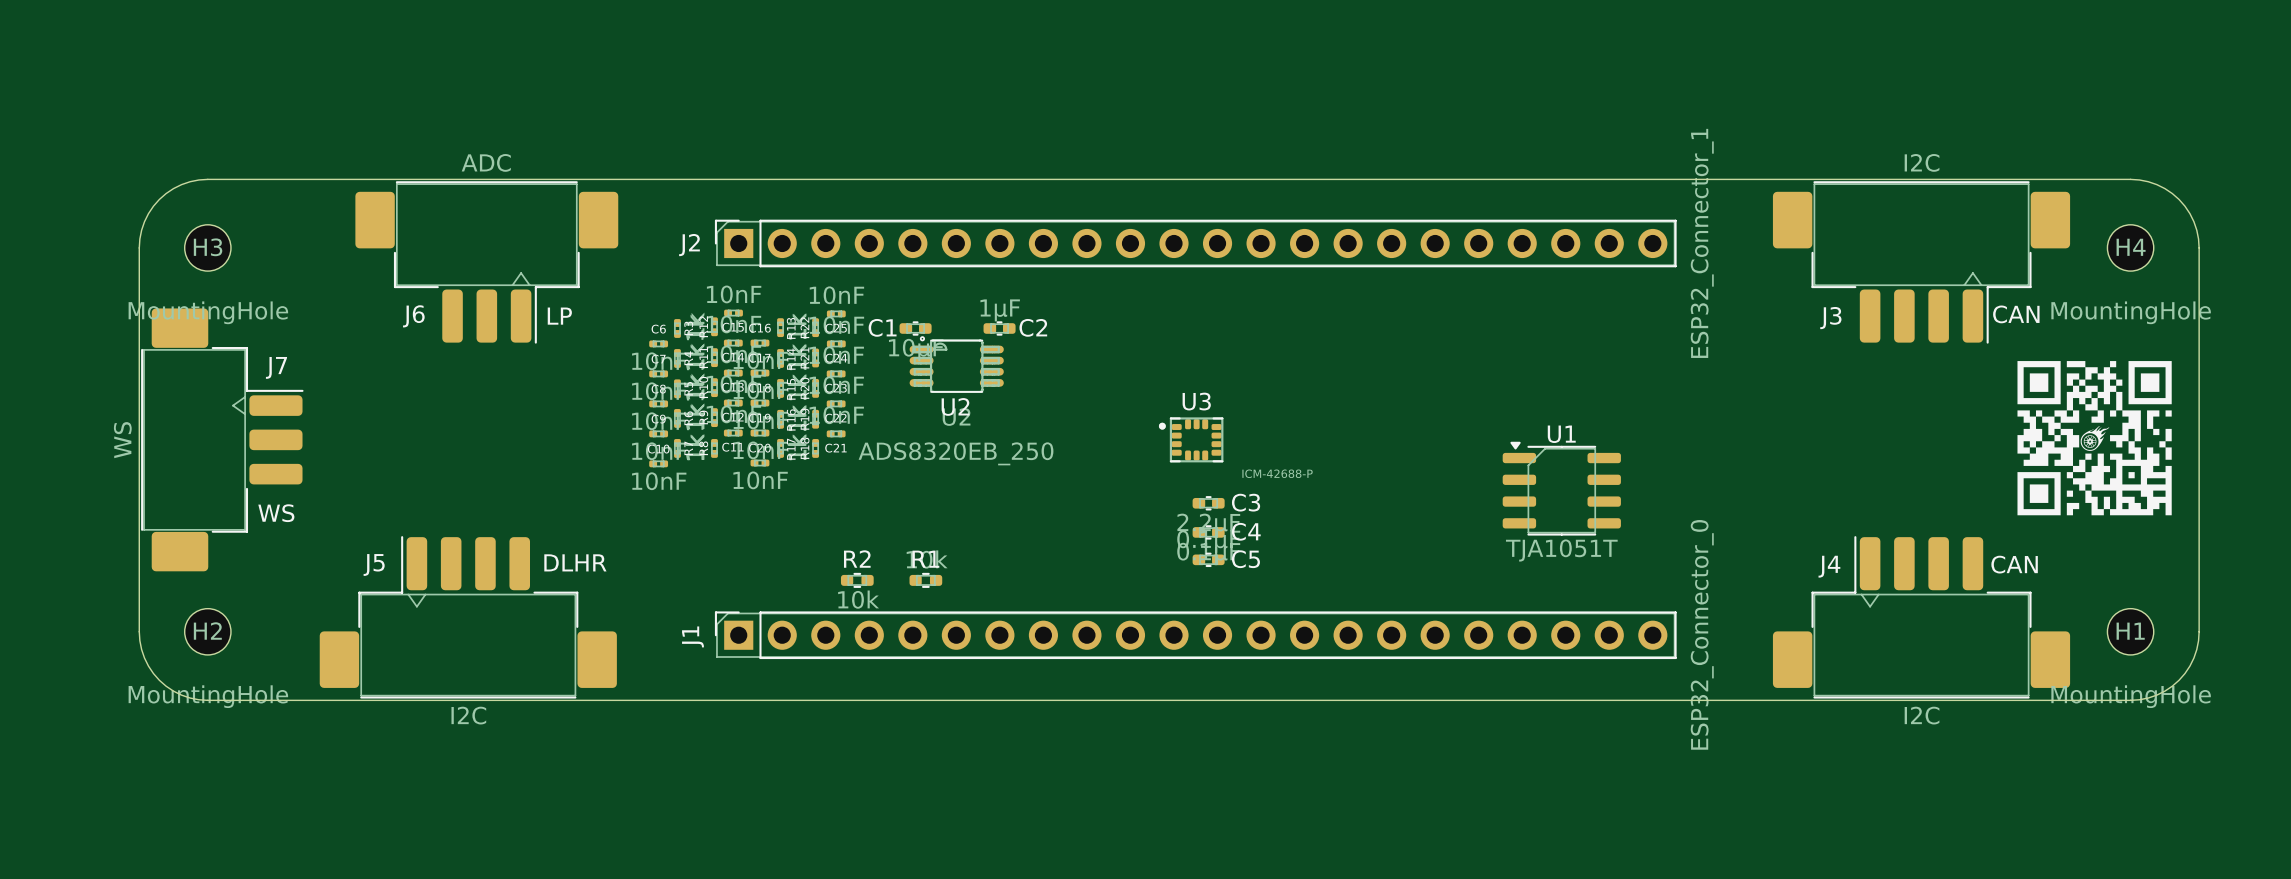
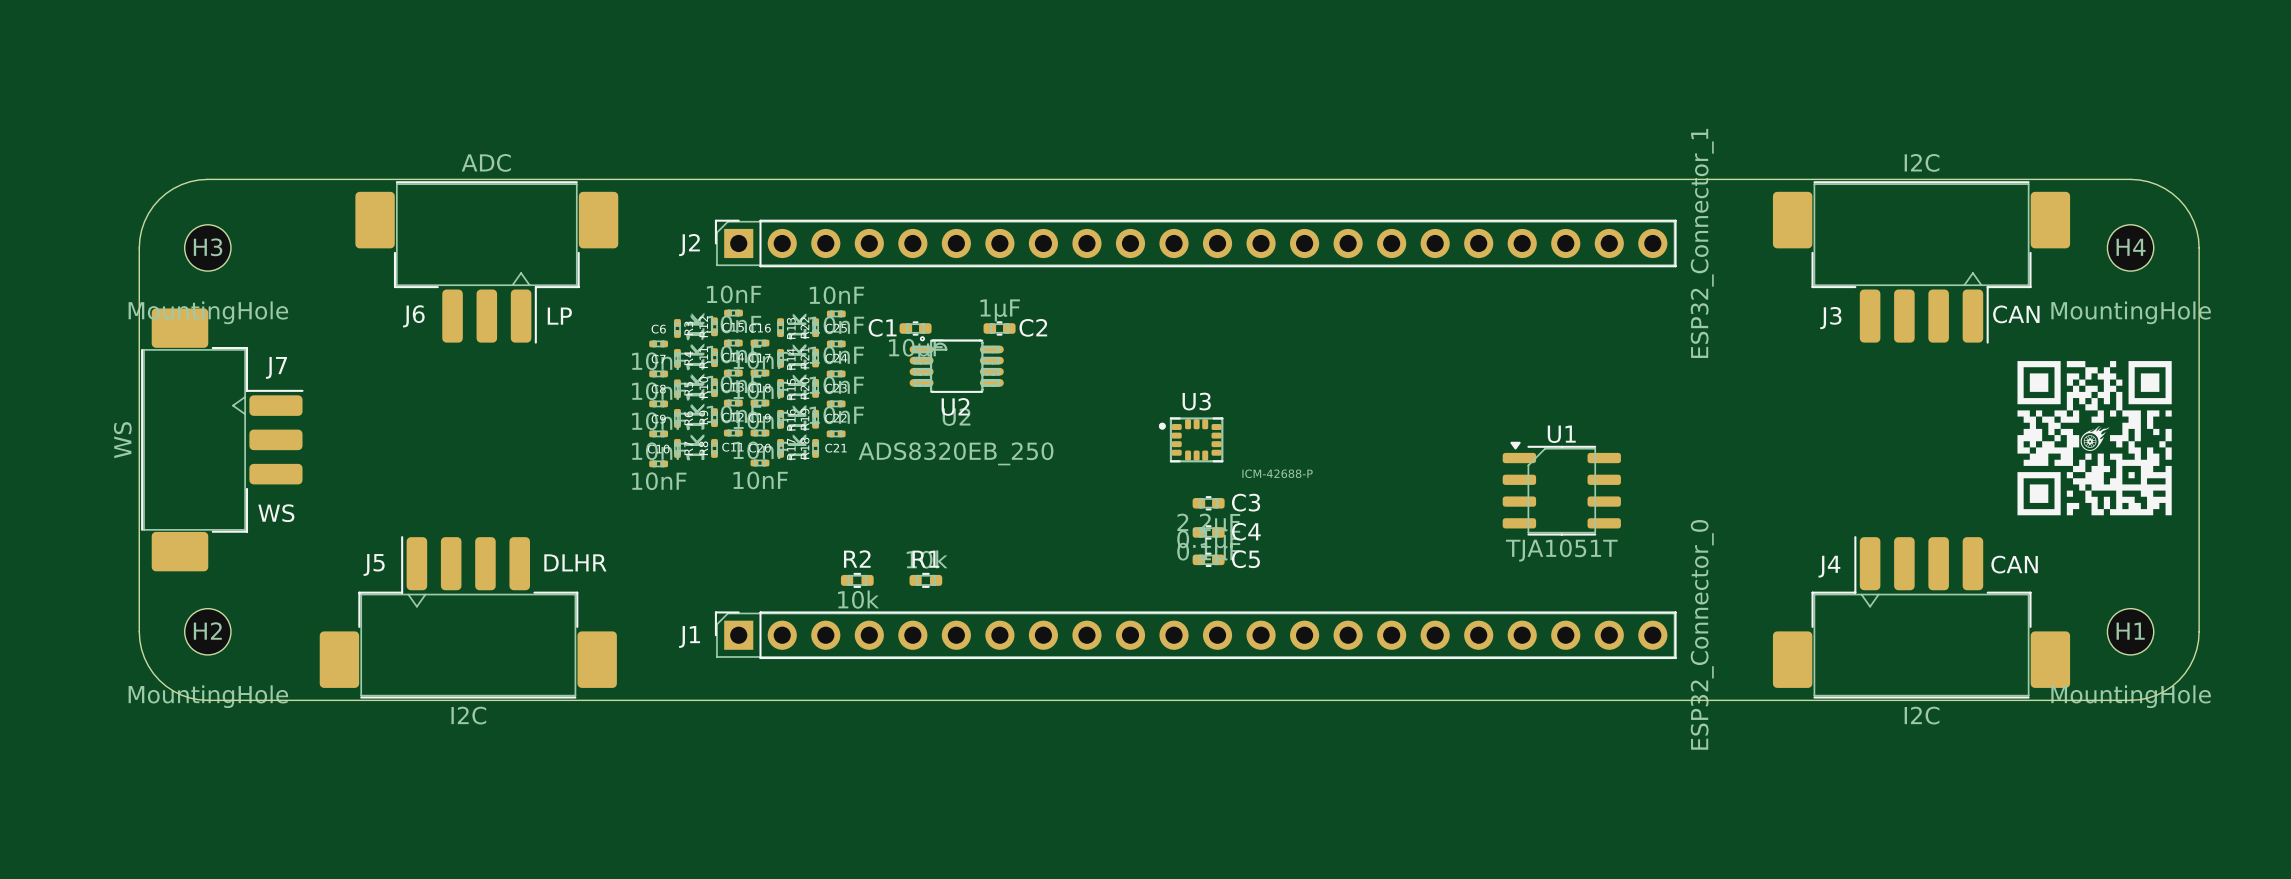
J1 name rotation: 0° (692, 636) -> 90° clockwise (689, 636)

